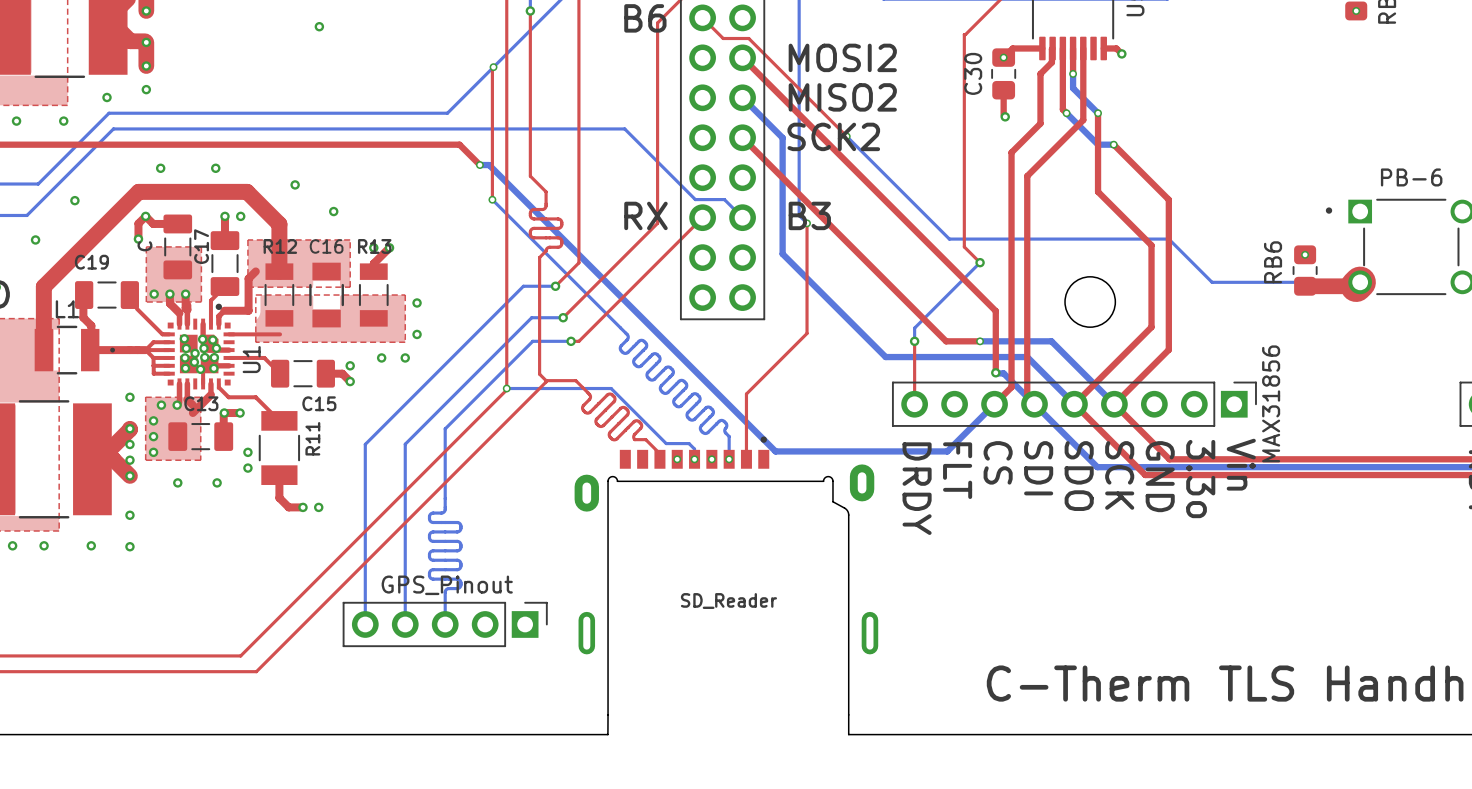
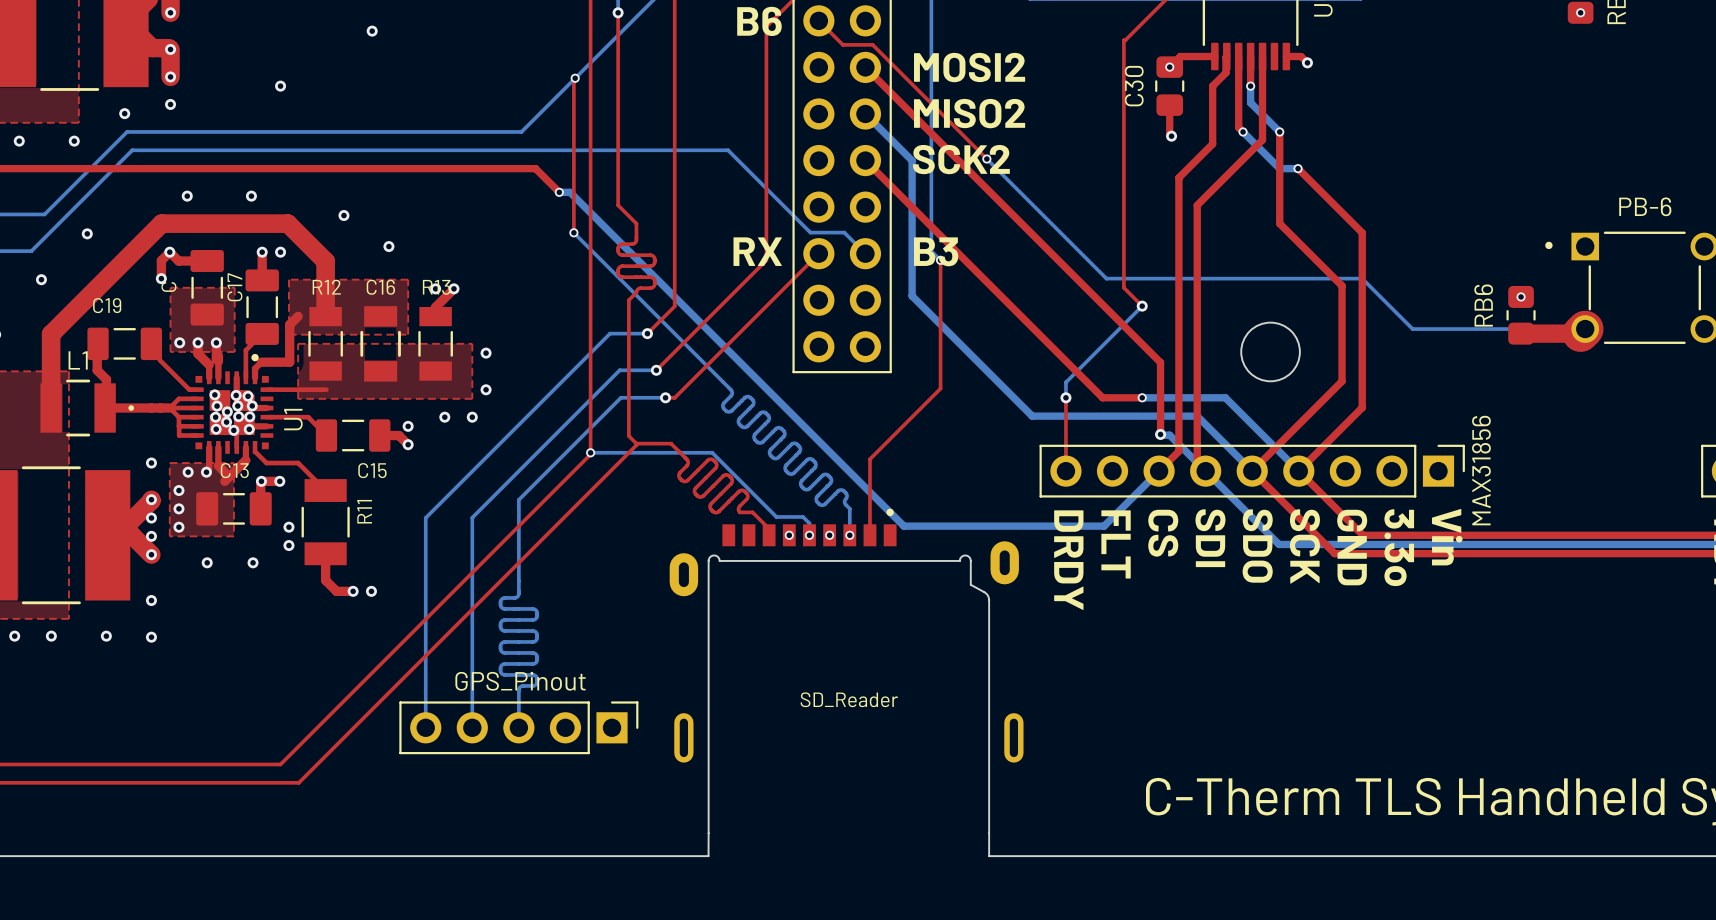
via: none -> (280, 86)

